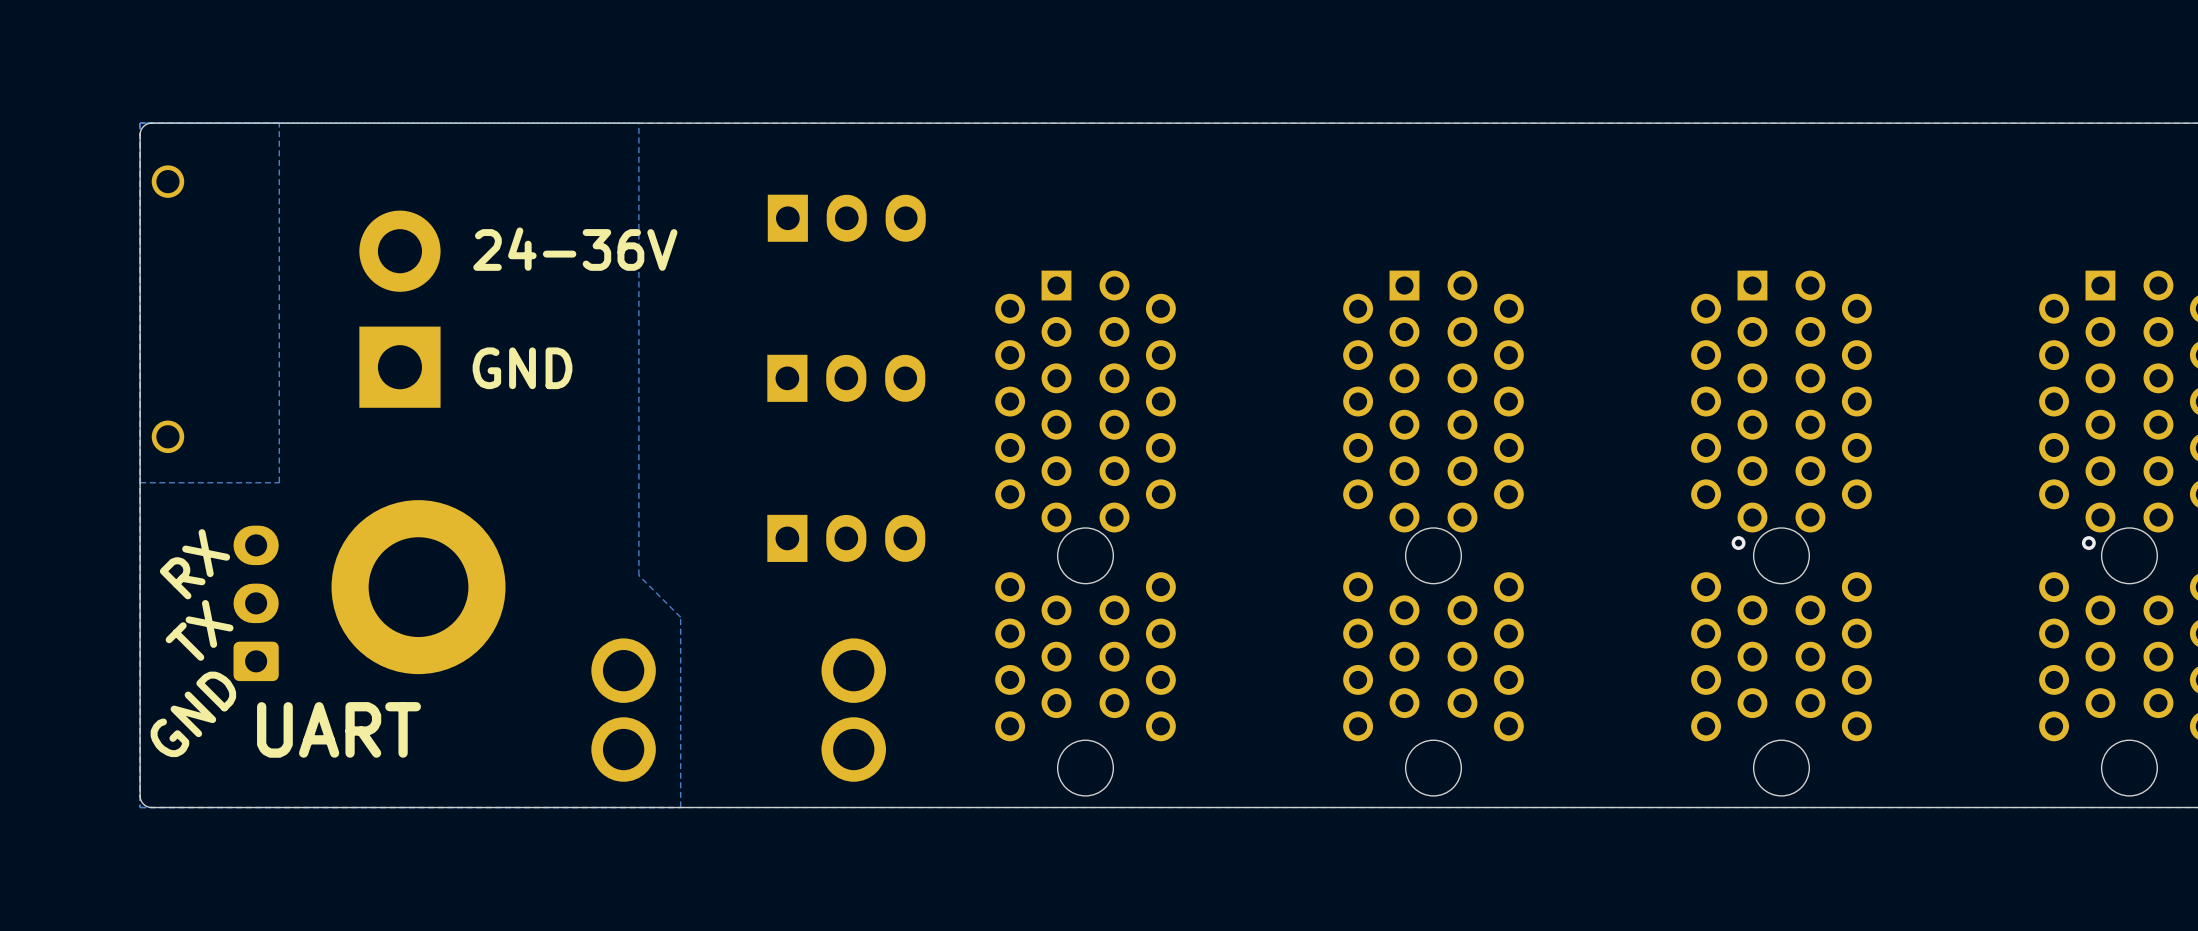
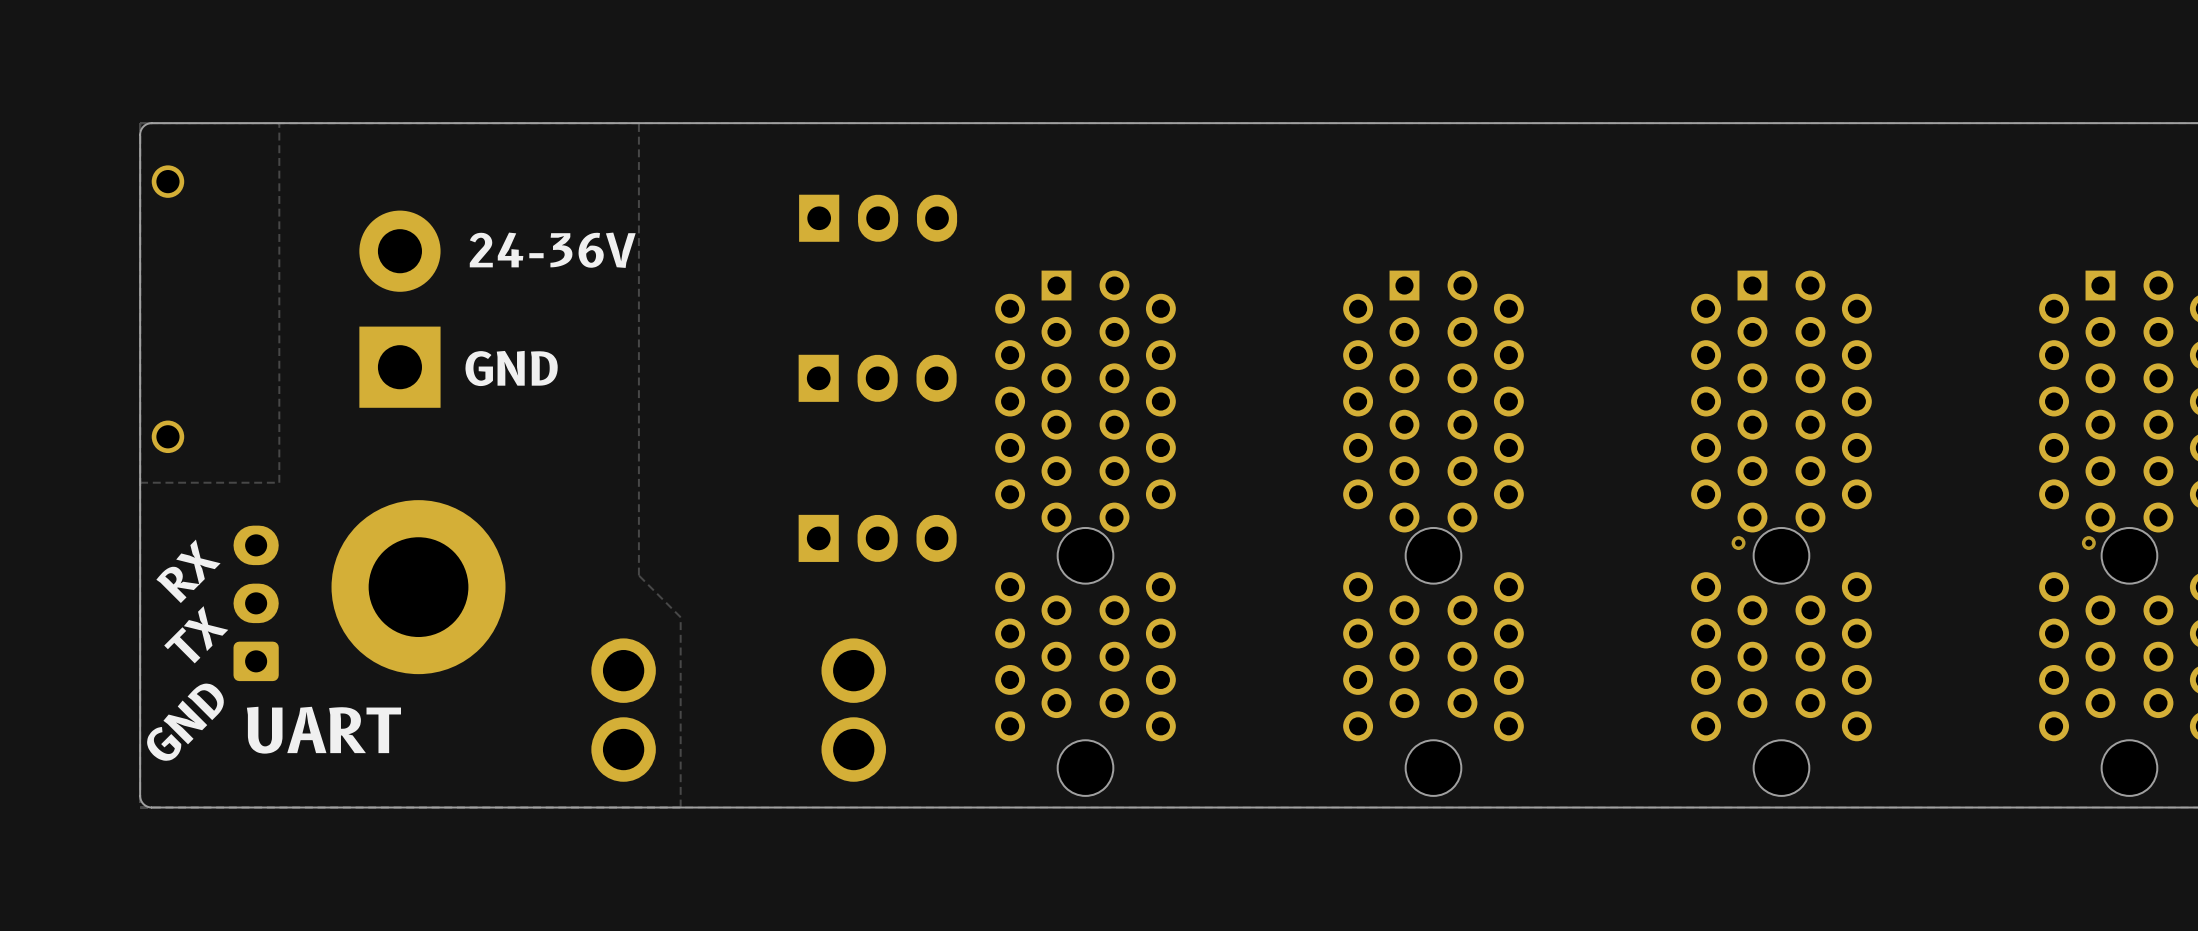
part position: (846, 218) -> (878, 218)
part position: (846, 378) -> (877, 378)
part position: (846, 538) -> (877, 538)

